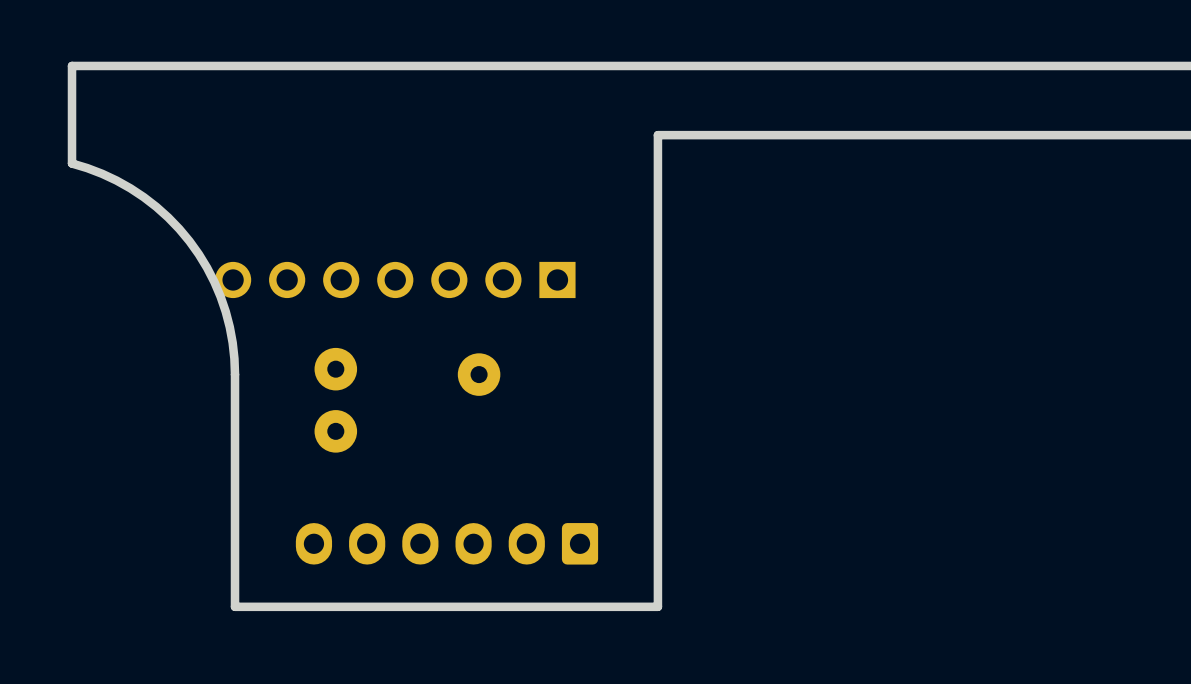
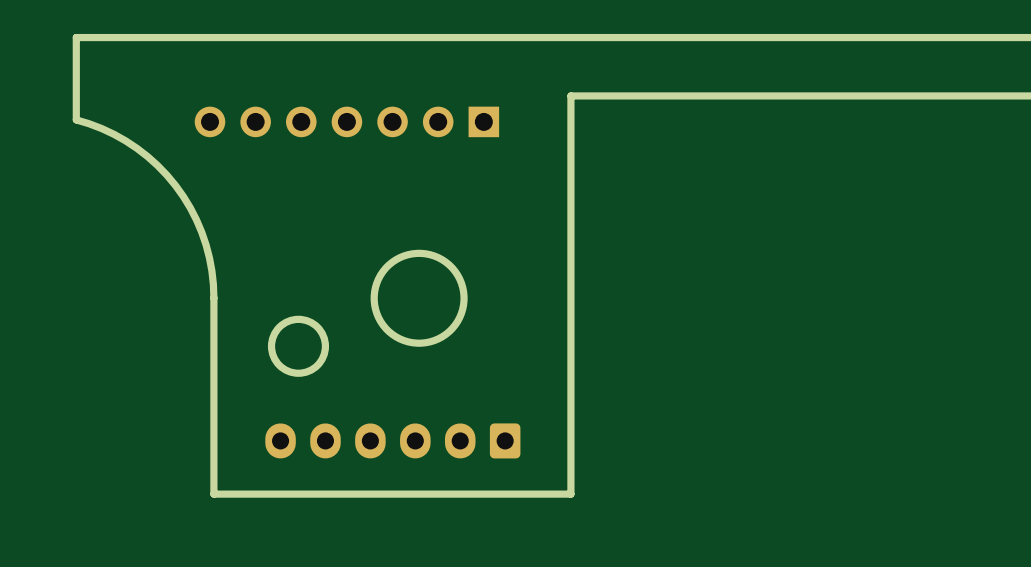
part position: (395, 279) -> (346, 121)
round board edge: none -> [370, 249, 468, 347]
part: (335, 369) -> none
part: (479, 374) -> none
round board edge: none -> [267, 315, 330, 377]
part: (335, 431) -> none

